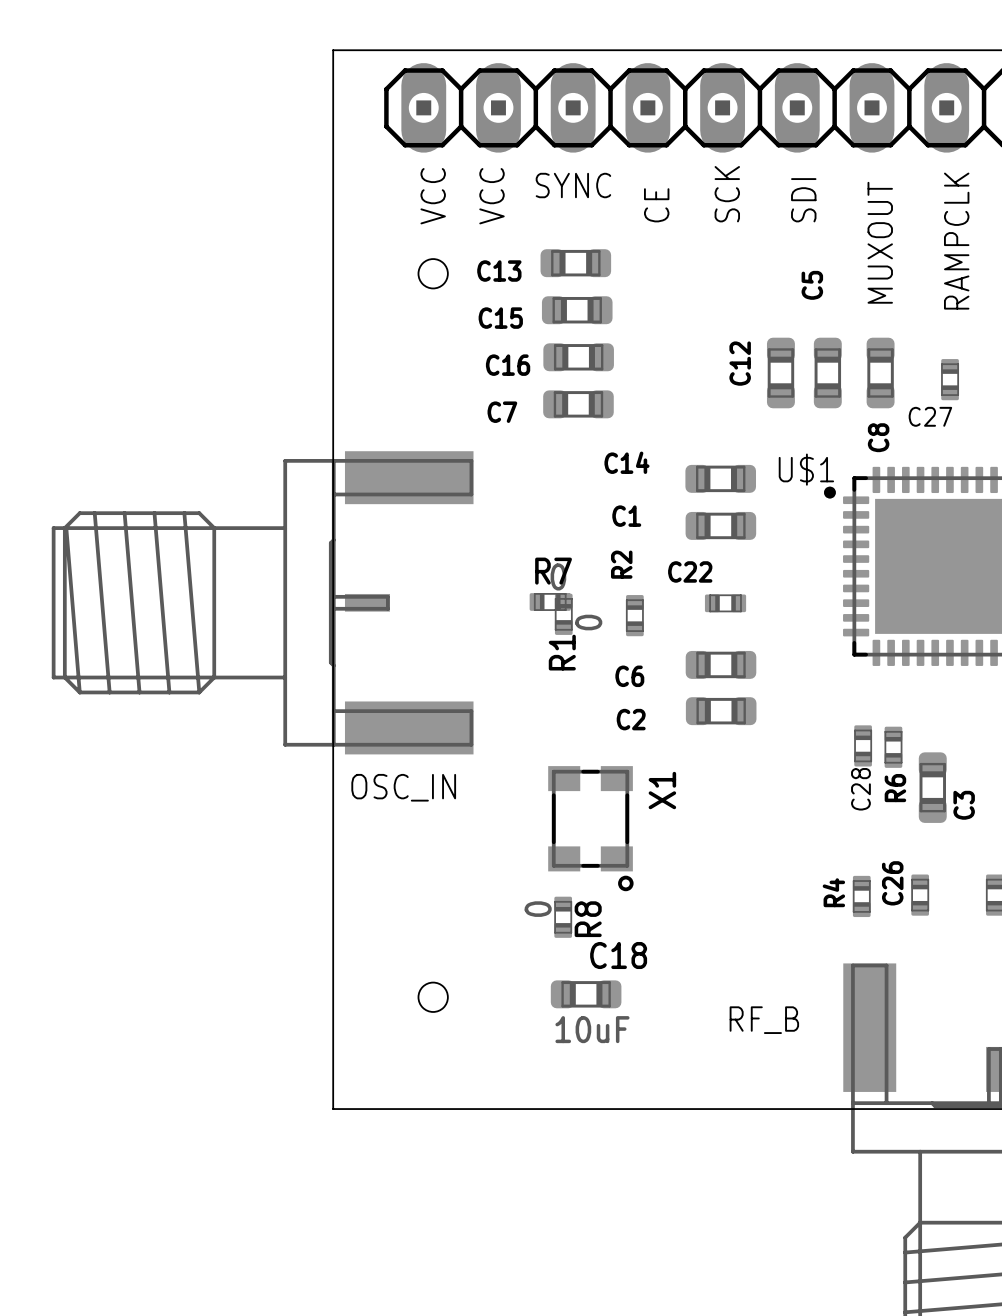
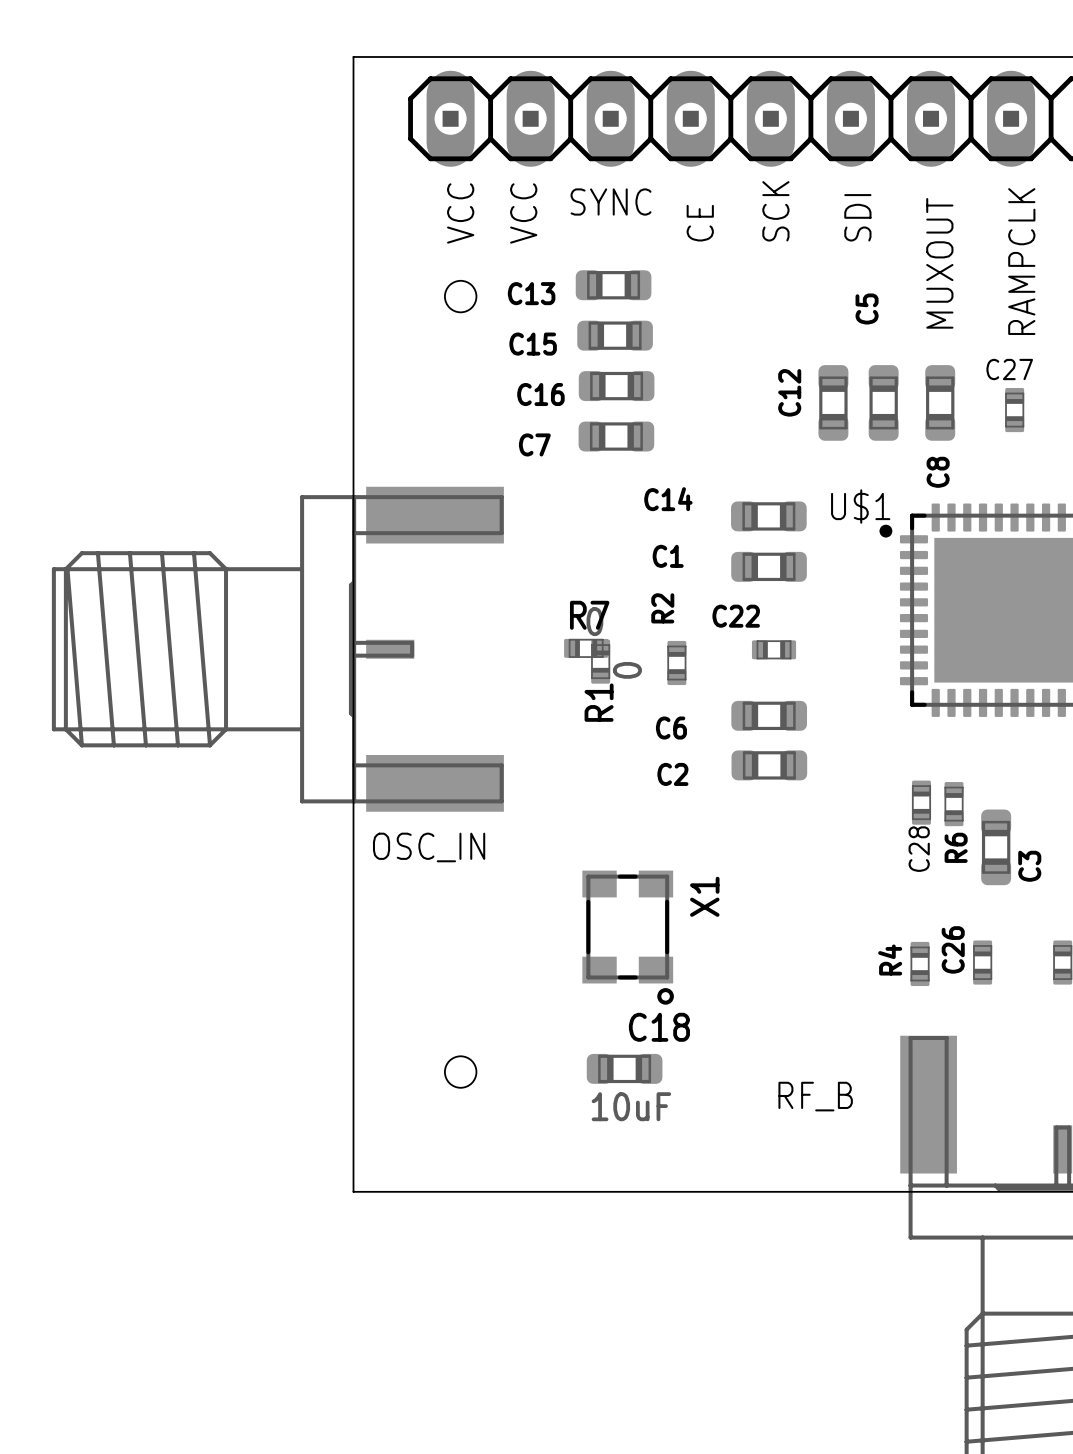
C27 name position: C27 (930, 416) -> C27 (1009, 369)
X1 position: (590, 828) -> (628, 937)
R8: 0 (563, 917) -> none

